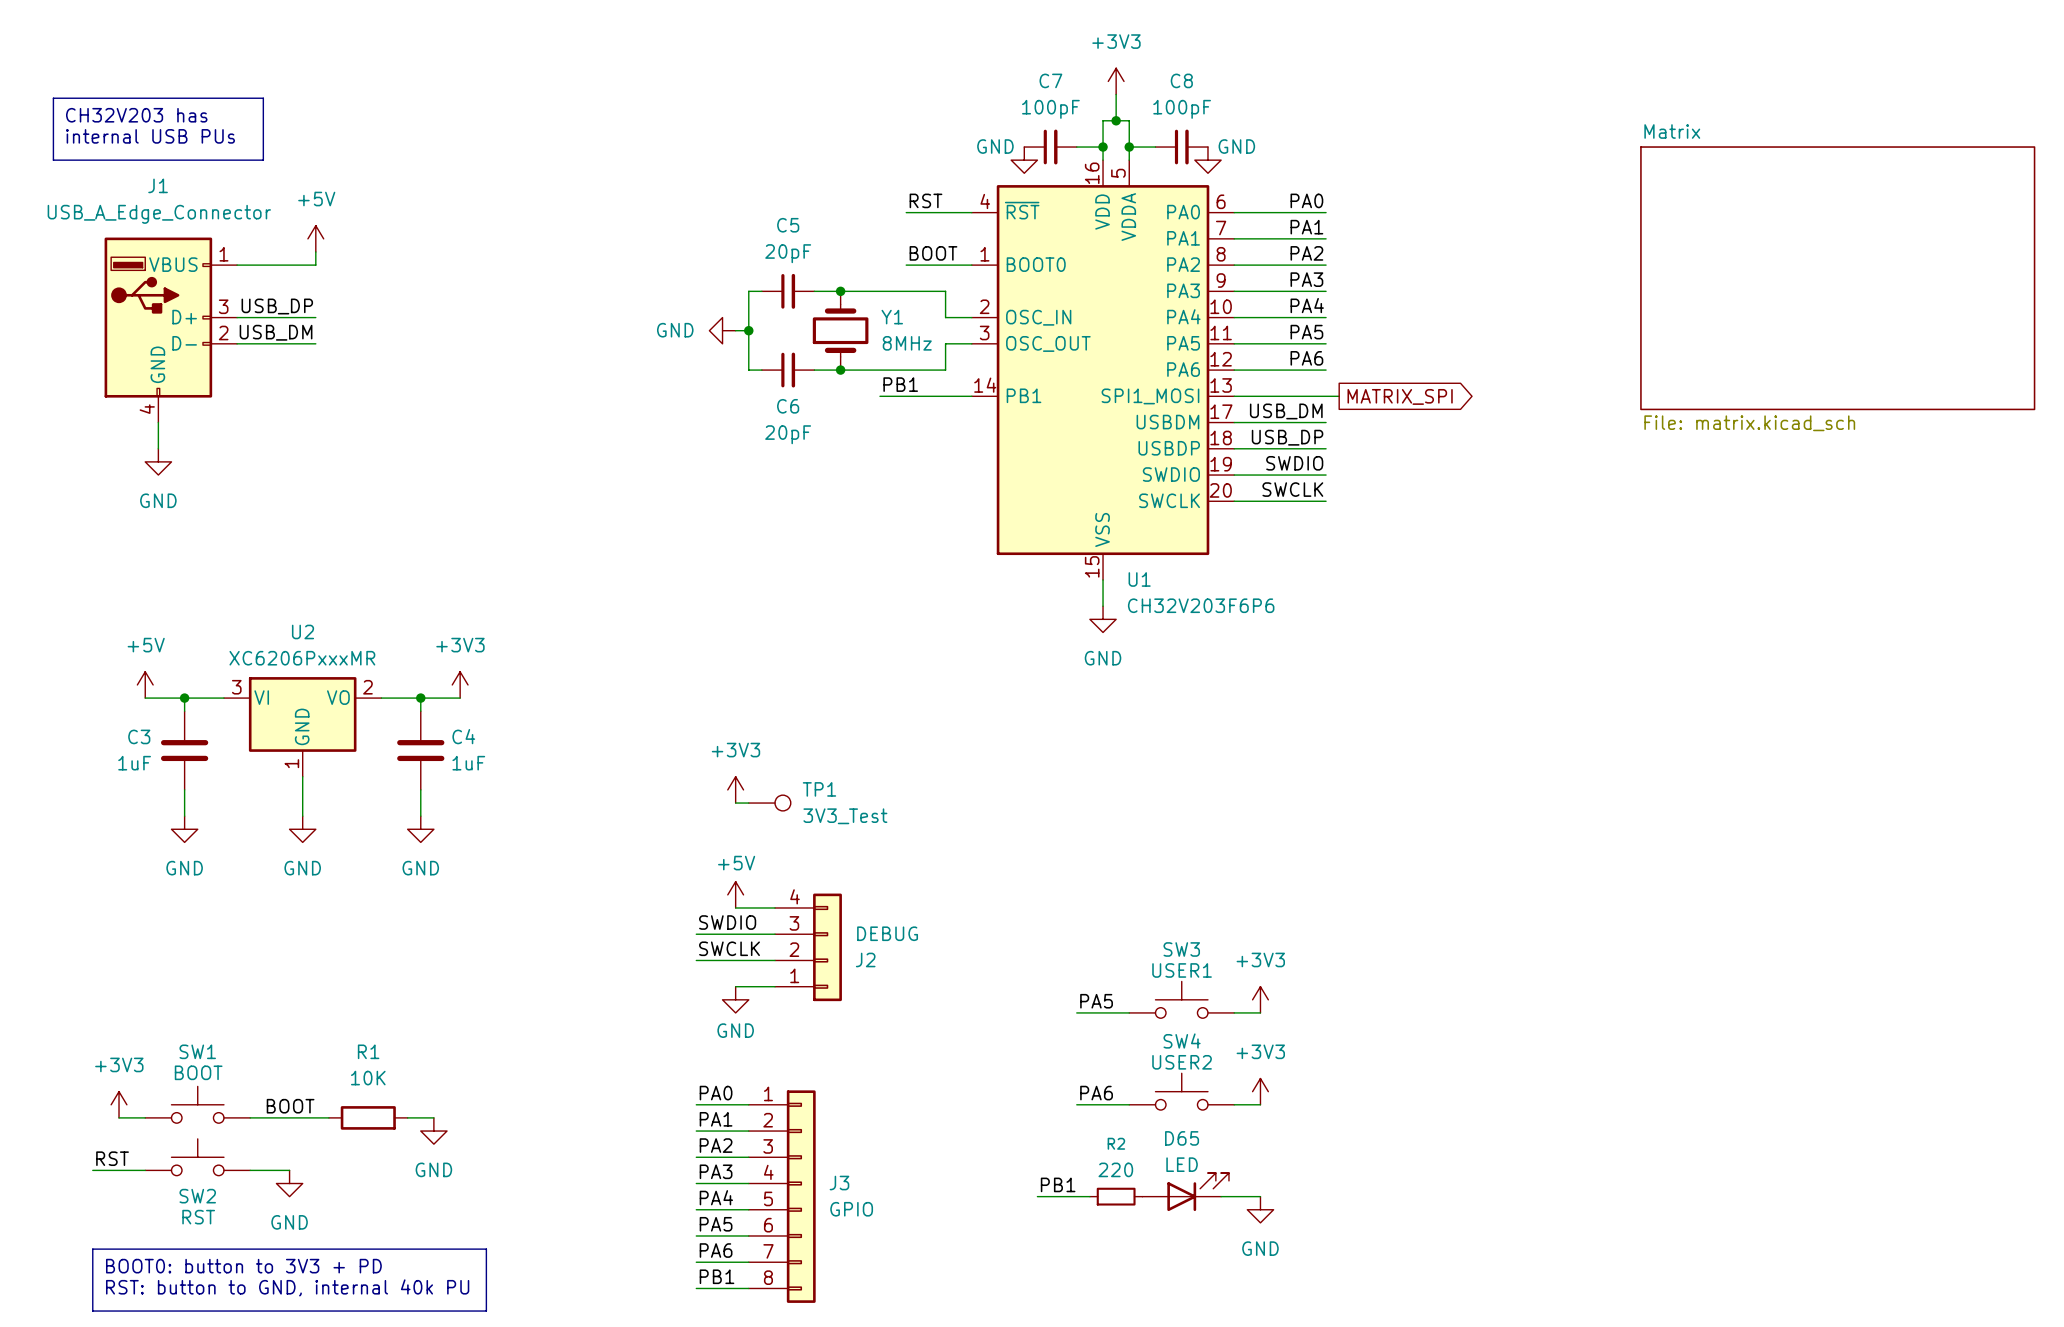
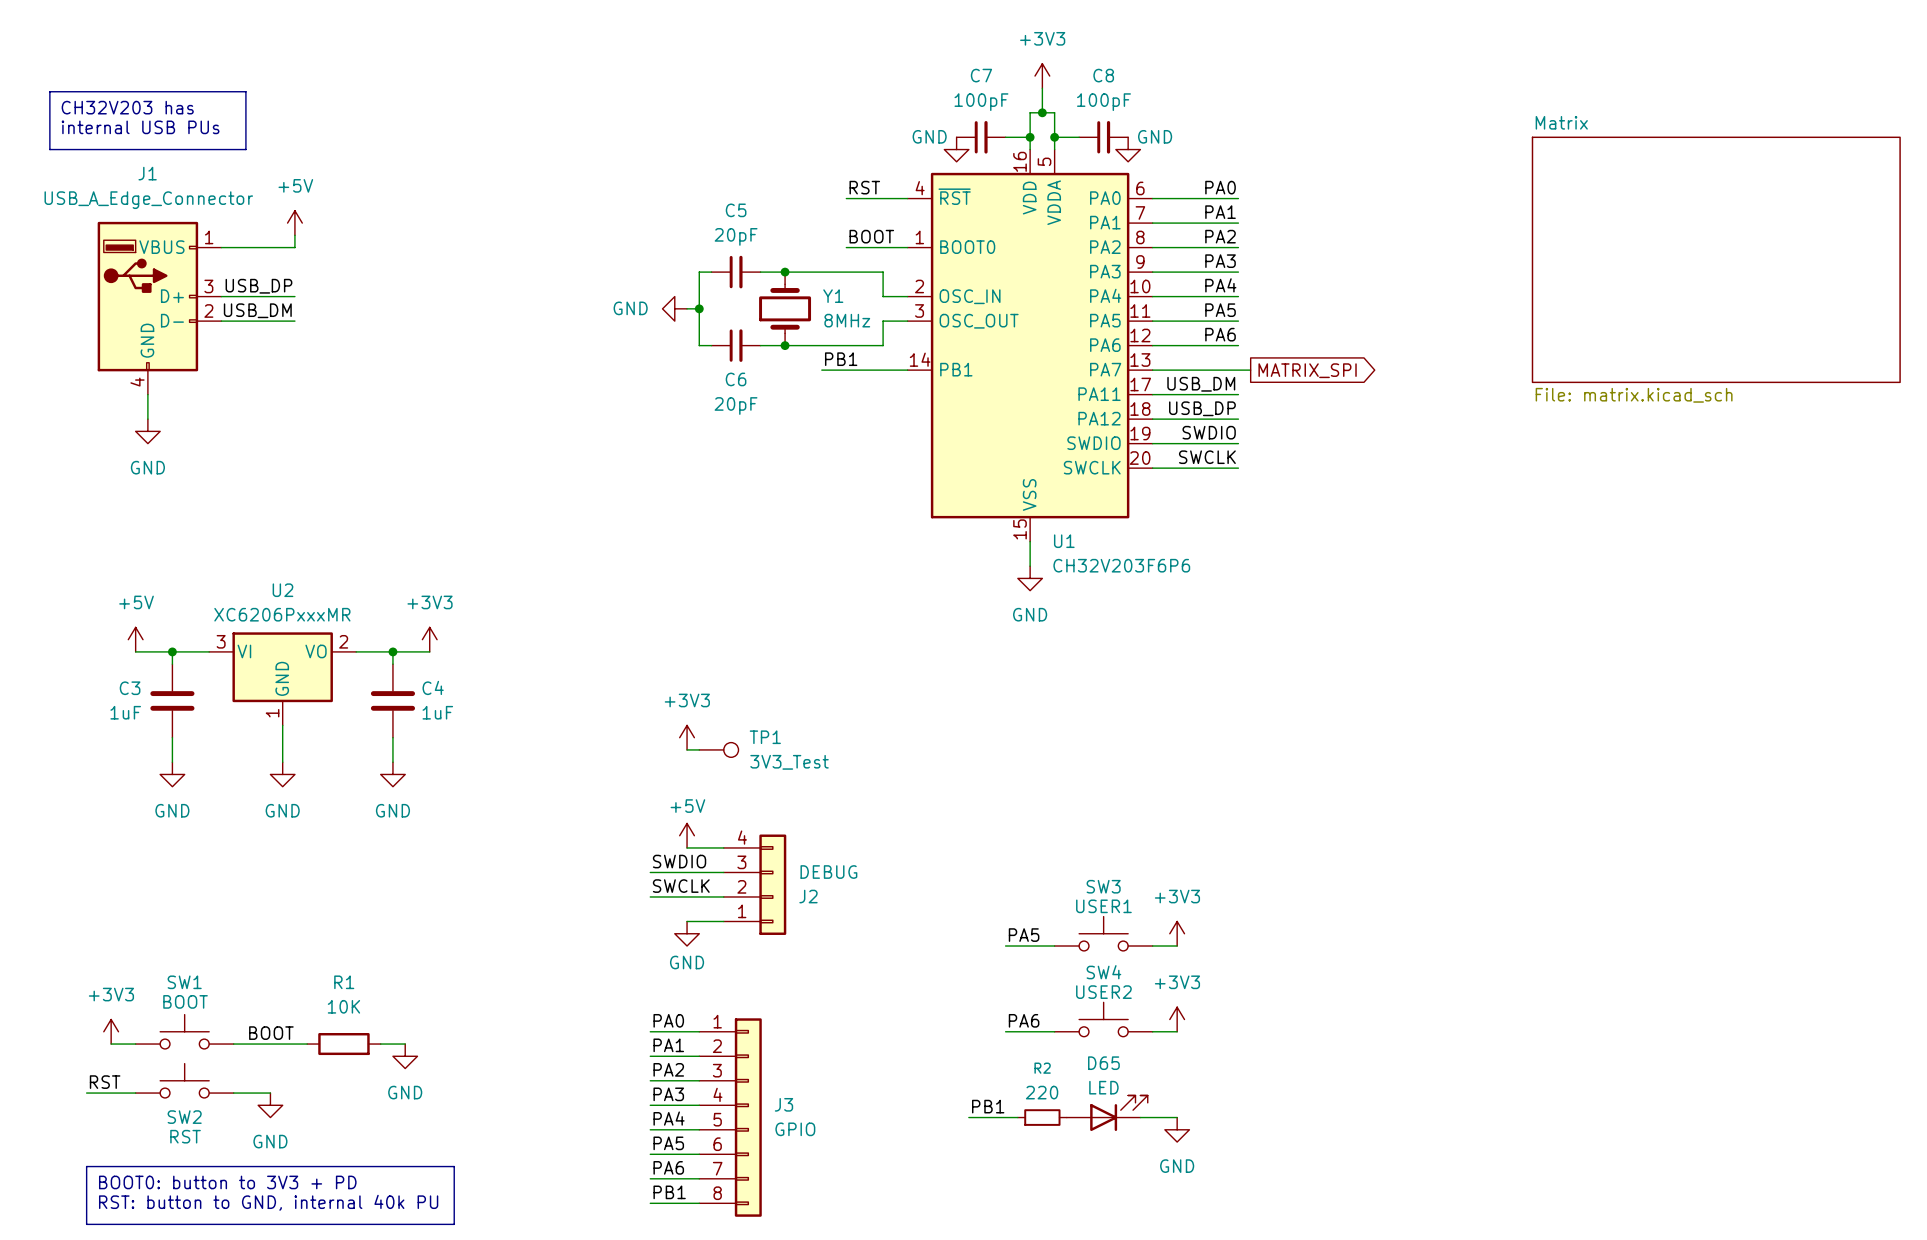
U1 pin name: SPI1_MOSI (1150, 396) -> PA7 (1105, 369)
U1 pin name: USBDM (1167, 422) -> PA11 (1099, 394)
U1 pin name: USBDP (1169, 448) -> PA12 (1099, 418)

